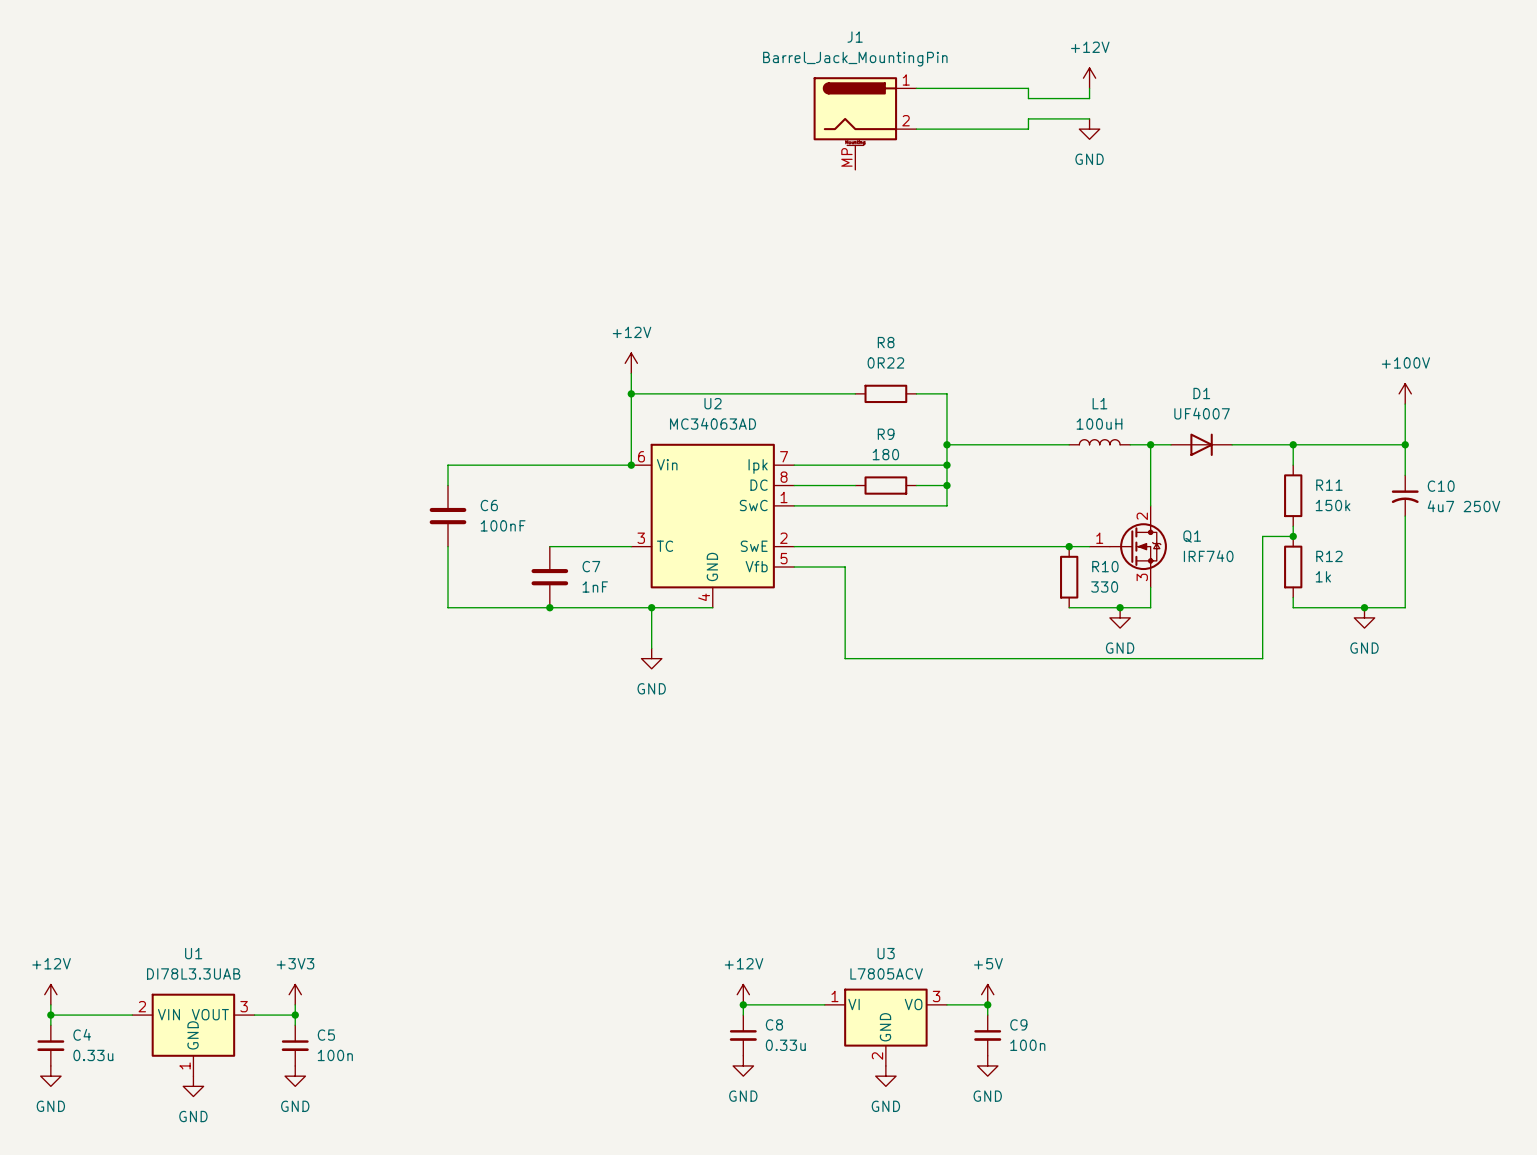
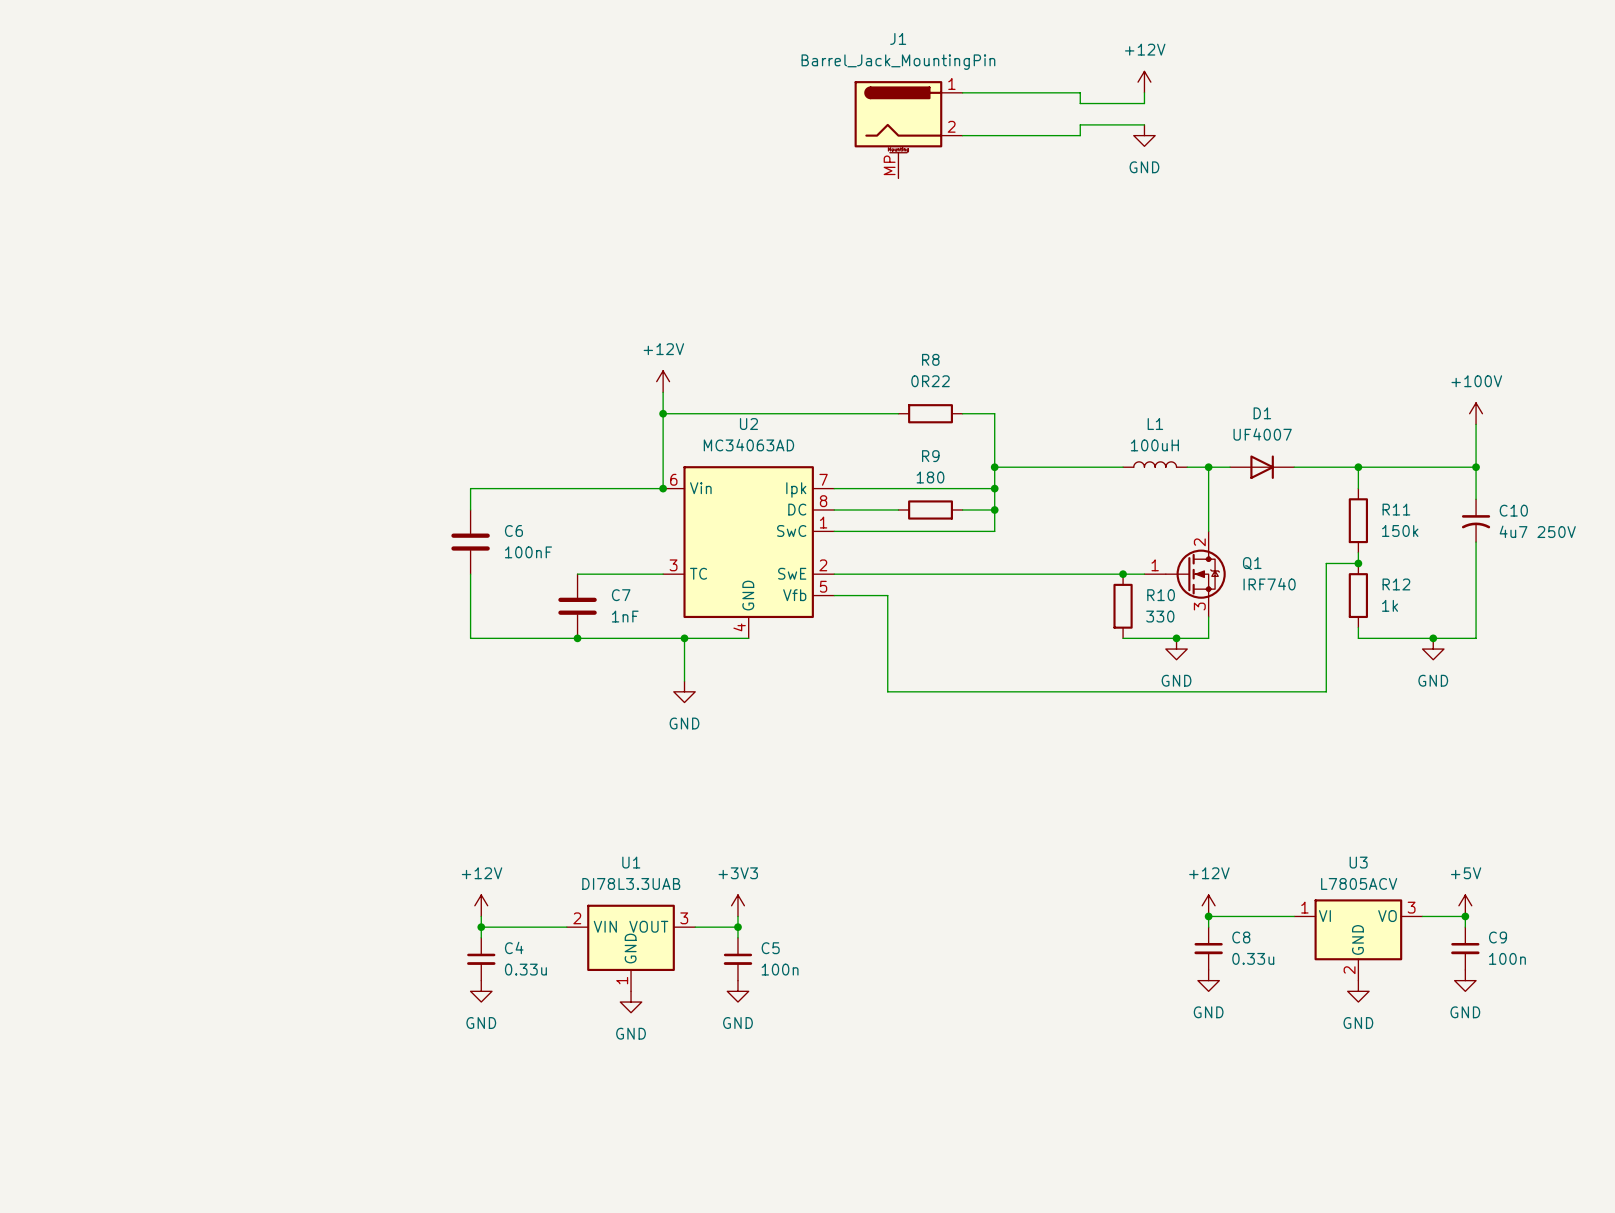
power symbol: none -> +12V (481, 905)
power symbol: none -> +3V3 (737, 905)
power symbol: none -> +12V (1208, 905)
power symbol: none -> +5V (1465, 905)
wire: none -> (481, 916) (481, 937)
wire: none -> (737, 916) (737, 937)
junction: none -> (1208, 916)
wire: none -> (1294, 916) (1208, 916) (1208, 927)
wire: none -> (1422, 916) (1465, 916) (1465, 927)
junction: none -> (1465, 916)
wire: none -> (481, 927) (566, 927)
junction: none -> (481, 927)
wire: none -> (695, 927) (737, 927)
junction: none -> (737, 927)
power symbol: none -> GND (1208, 980)
power symbol: none -> GND (1465, 980)
power symbol: none -> GND (481, 991)
power symbol: none -> GND (737, 991)
power symbol: none -> GND (1358, 991)
power symbol: none -> GND (631, 1002)
power symbol: +12V (50, 994) -> none
power symbol: +3V3 (295, 994) -> none
power symbol: +12V (743, 994) -> none
power symbol: +5V (987, 994) -> none
wire: (50, 1004) (50, 1025) -> none
wire: (295, 1004) (295, 1025) -> none
junction: (743, 1004) -> none
wire: (824, 1004) (743, 1004) (743, 1015) -> none
wire: (946, 1004) (987, 1004) (987, 1015) -> none
junction: (987, 1004) -> none
wire: (50, 1015) (132, 1015) -> none
junction: (50, 1015) -> none
wire: (254, 1015) (295, 1015) -> none
junction: (295, 1015) -> none
U3 position: (885, 1027) -> (1358, 939)
U1 position: (193, 1034) -> (631, 948)
C8 position: (743, 1035) -> (1208, 948)
C9 position: (987, 1035) -> (1465, 948)
C4 position: (50, 1045) -> (481, 959)
C5 position: (295, 1045) -> (737, 959)
power symbol: GND (743, 1065) -> none
power symbol: GND (987, 1065) -> none
power symbol: GND (50, 1076) -> none
power symbol: GND (295, 1076) -> none
power symbol: GND (885, 1076) -> none
power symbol: GND (193, 1086) -> none

